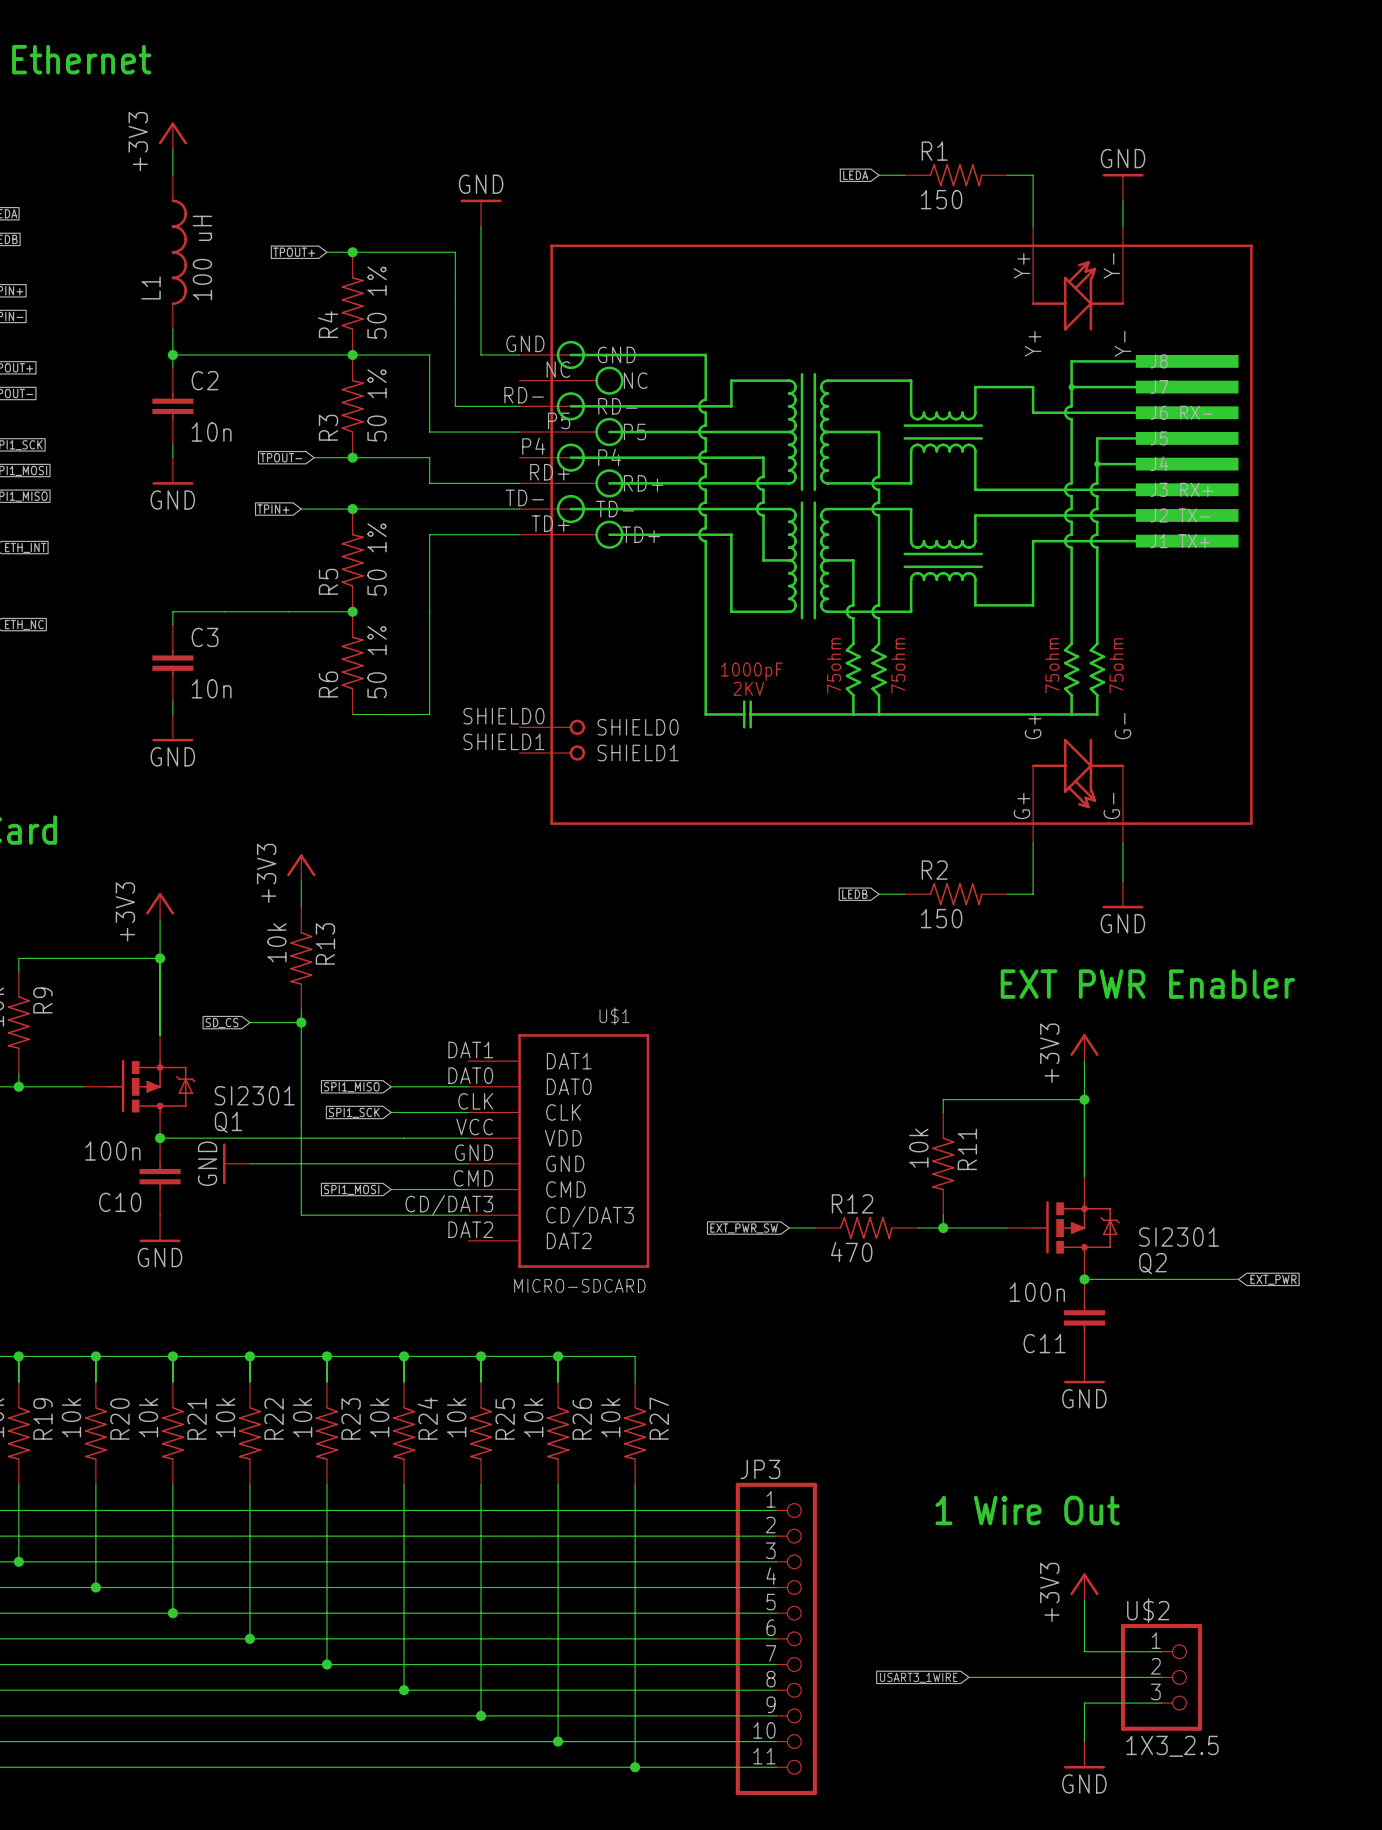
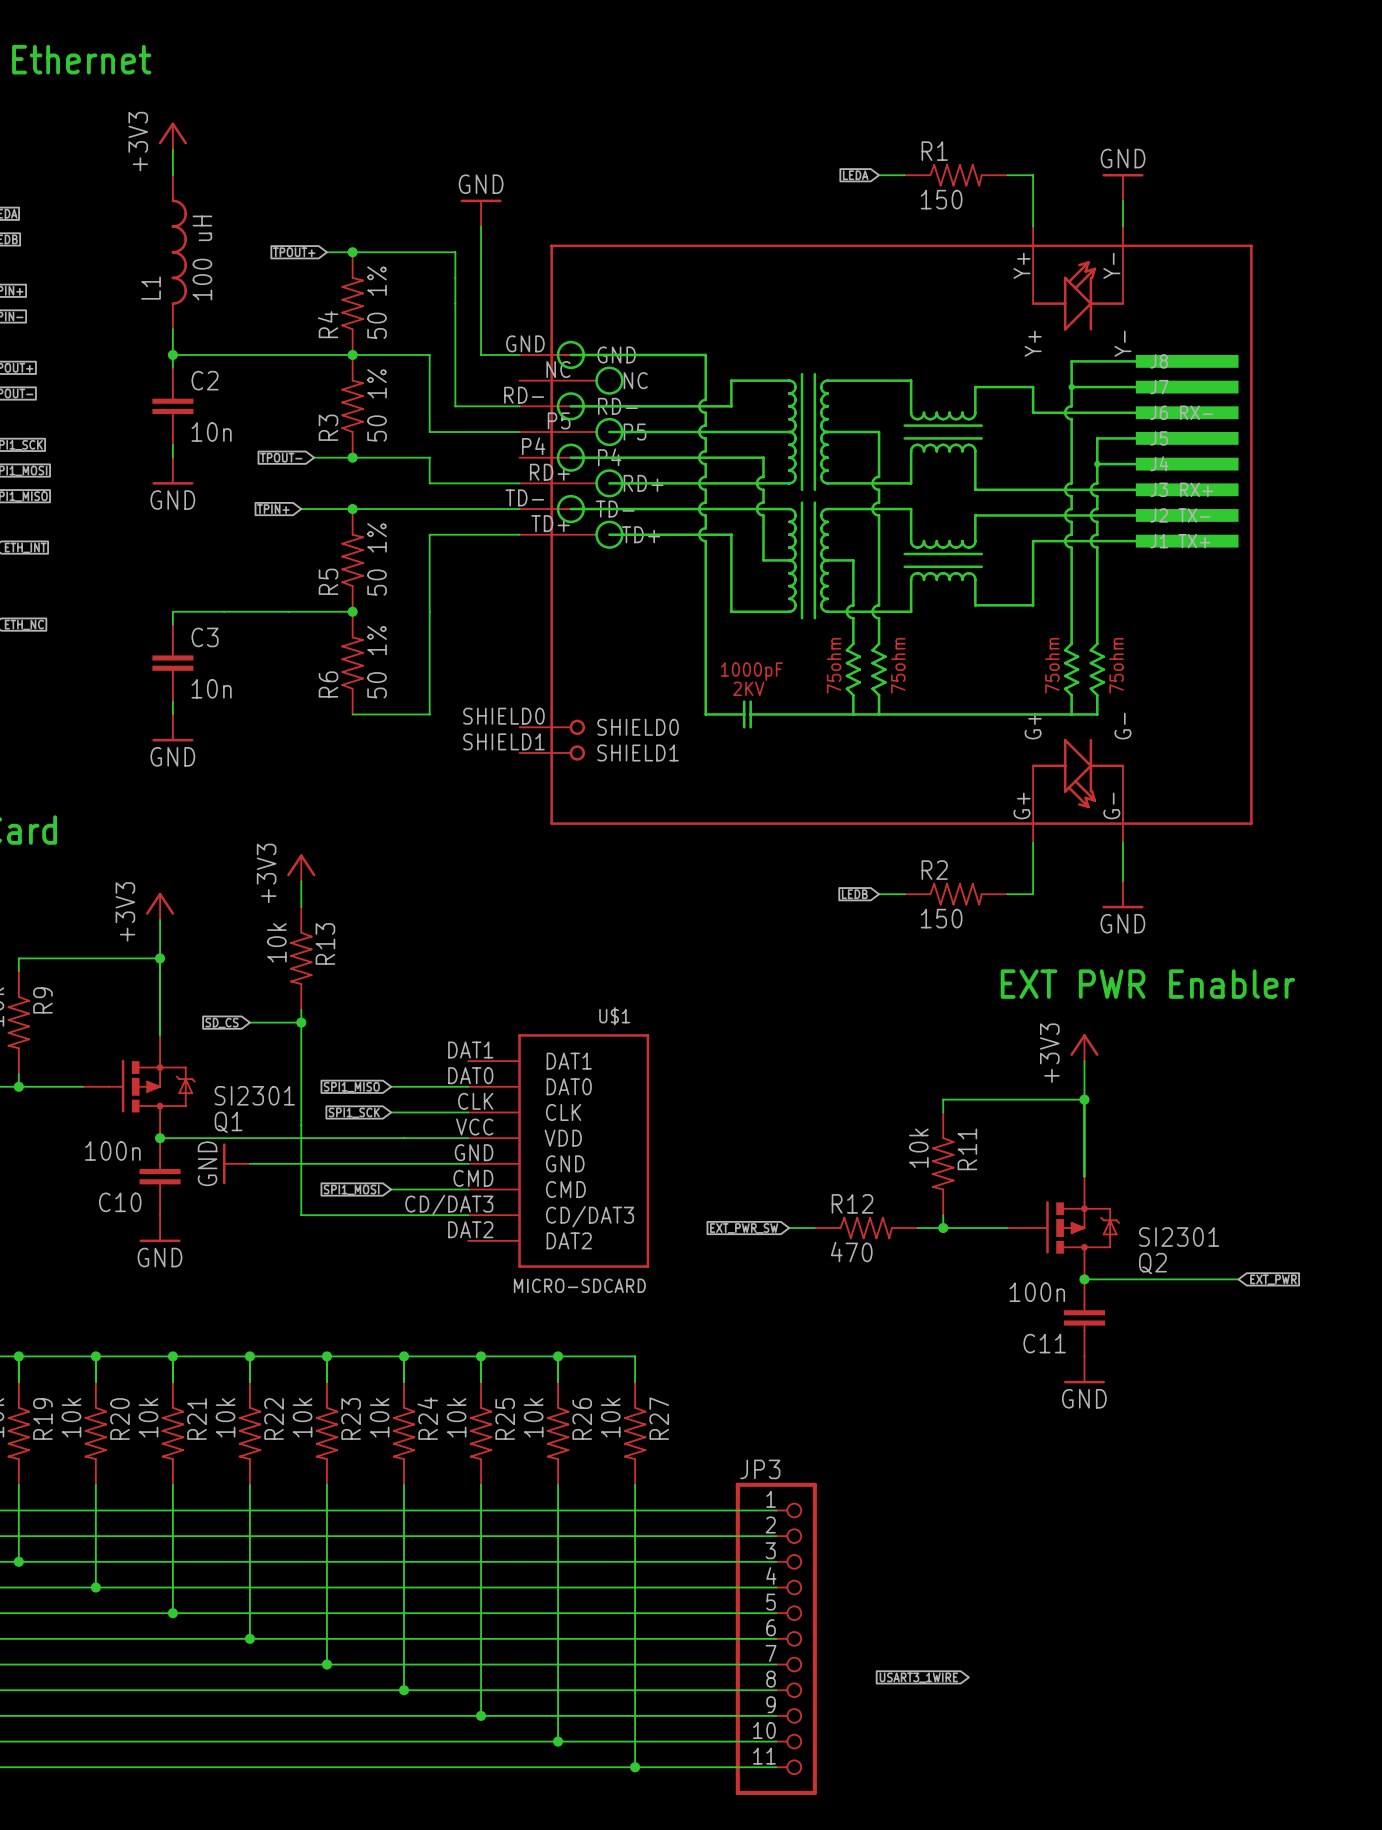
text: 1 Wire Out (1027, 1510) -> none
power symbol: +3V3 (1084, 1586) -> none
wire: (1084, 1600) (1084, 1651) (1161, 1651) -> none
wire: (968, 1677) (1161, 1677) -> none
U$2: 1X3_2.5 (1161, 1677) -> none
wire: (1161, 1703) (1084, 1703) (1084, 1741) -> none
power symbol: GND (1084, 1755) -> none

